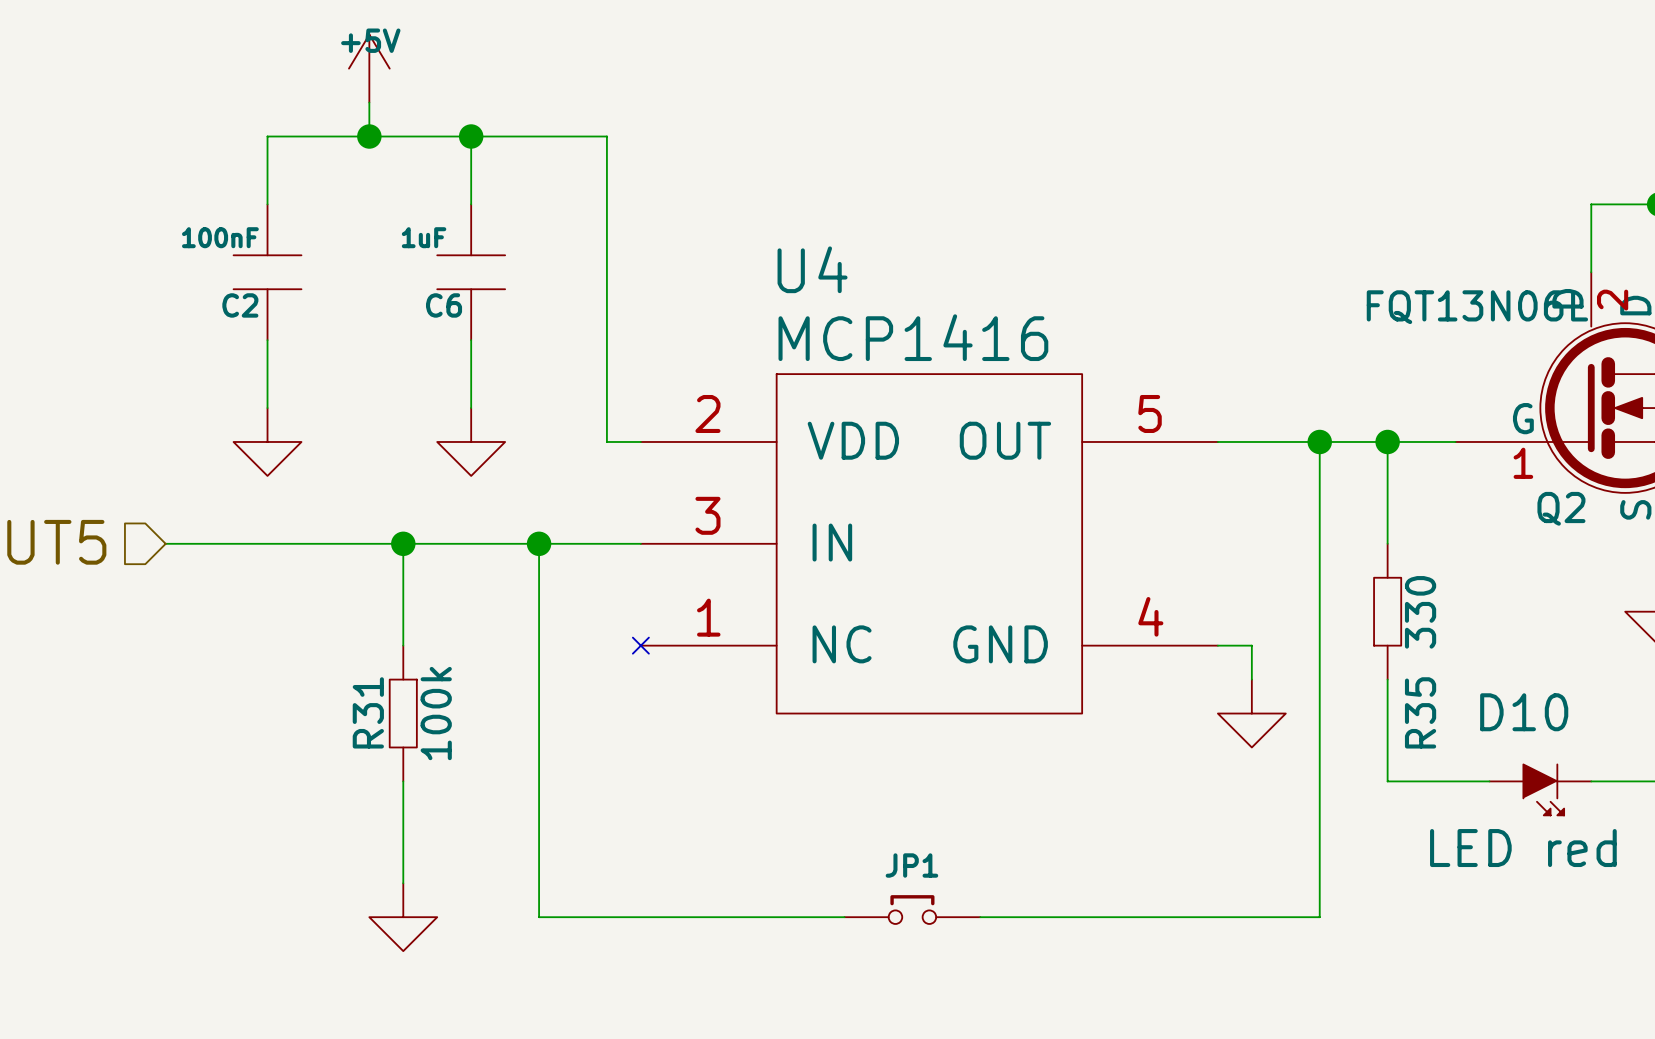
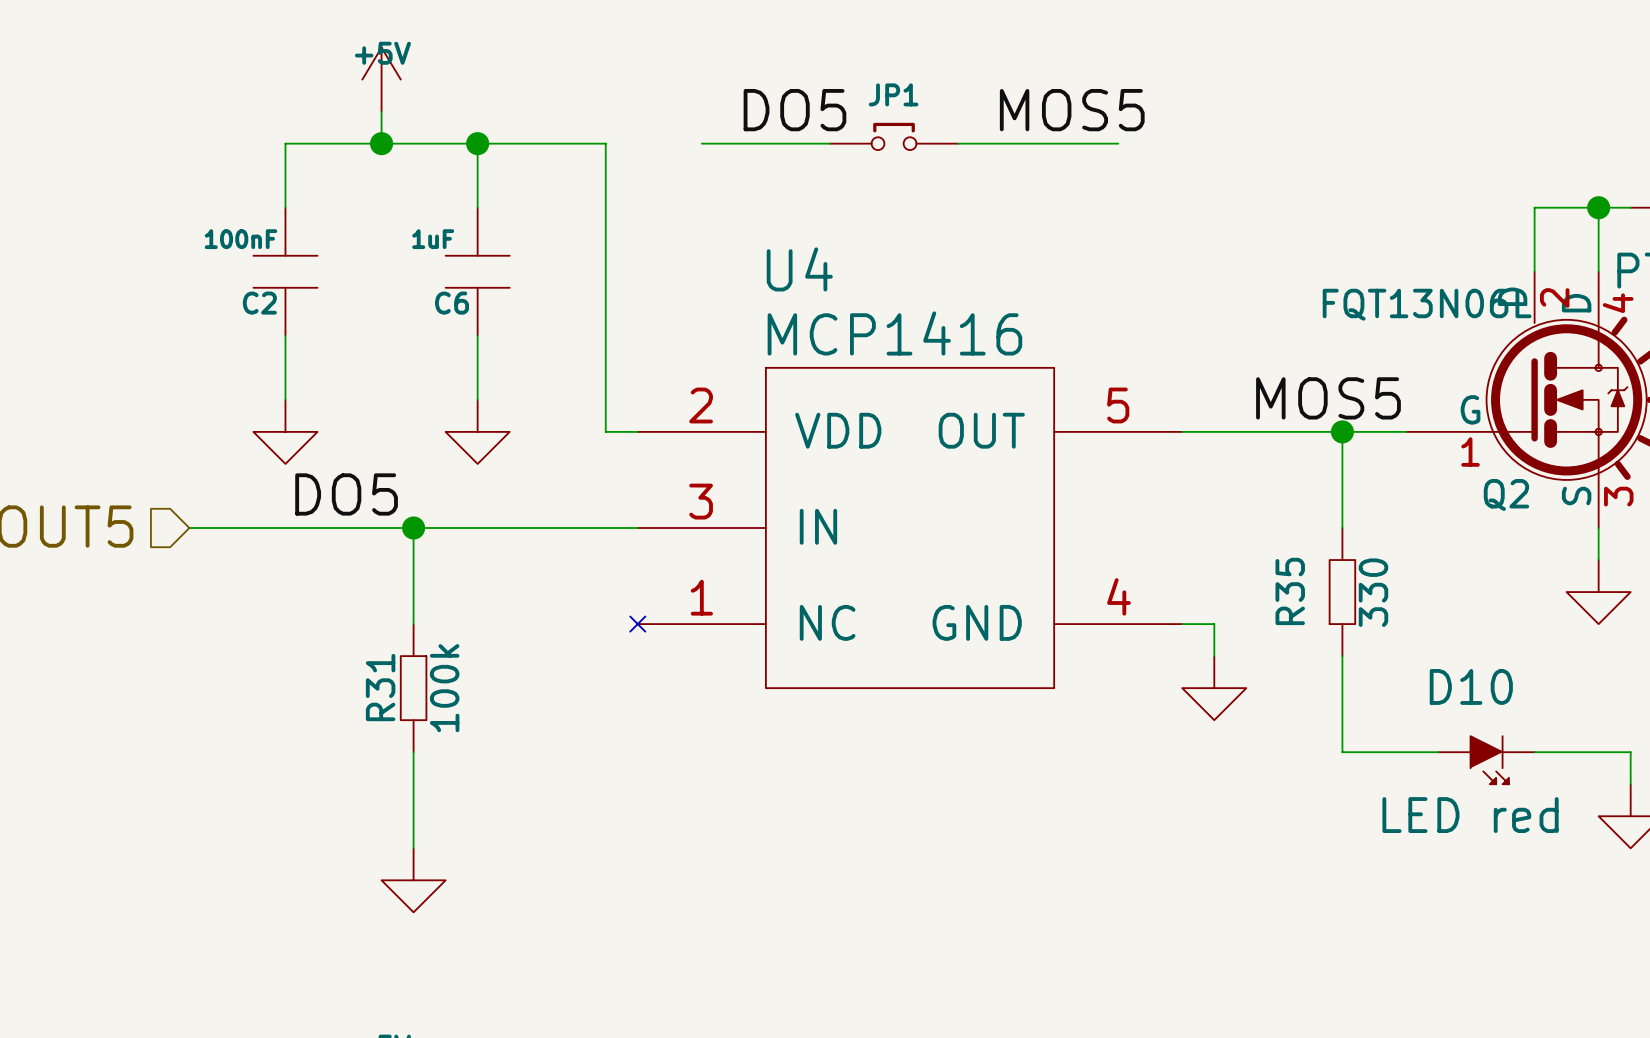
label: none -> DO5 (794, 110)
label: none -> MOS5 (1072, 110)
wire: none -> (701, 143) (829, 143)
wire: none -> (958, 143) (1118, 143)
label: none -> MOS5 (1328, 398)
wire: (1319, 441) (1319, 917) (980, 917) -> none
junction: (1319, 441) -> none
label: none -> DO5 (346, 494)
wire: (539, 543) (539, 917) (844, 917) -> none
junction: (539, 543) -> none
R35 name position: R35 (1420, 712) -> R35 (1290, 591)
JP1 position: (912, 909) -> (894, 136)

